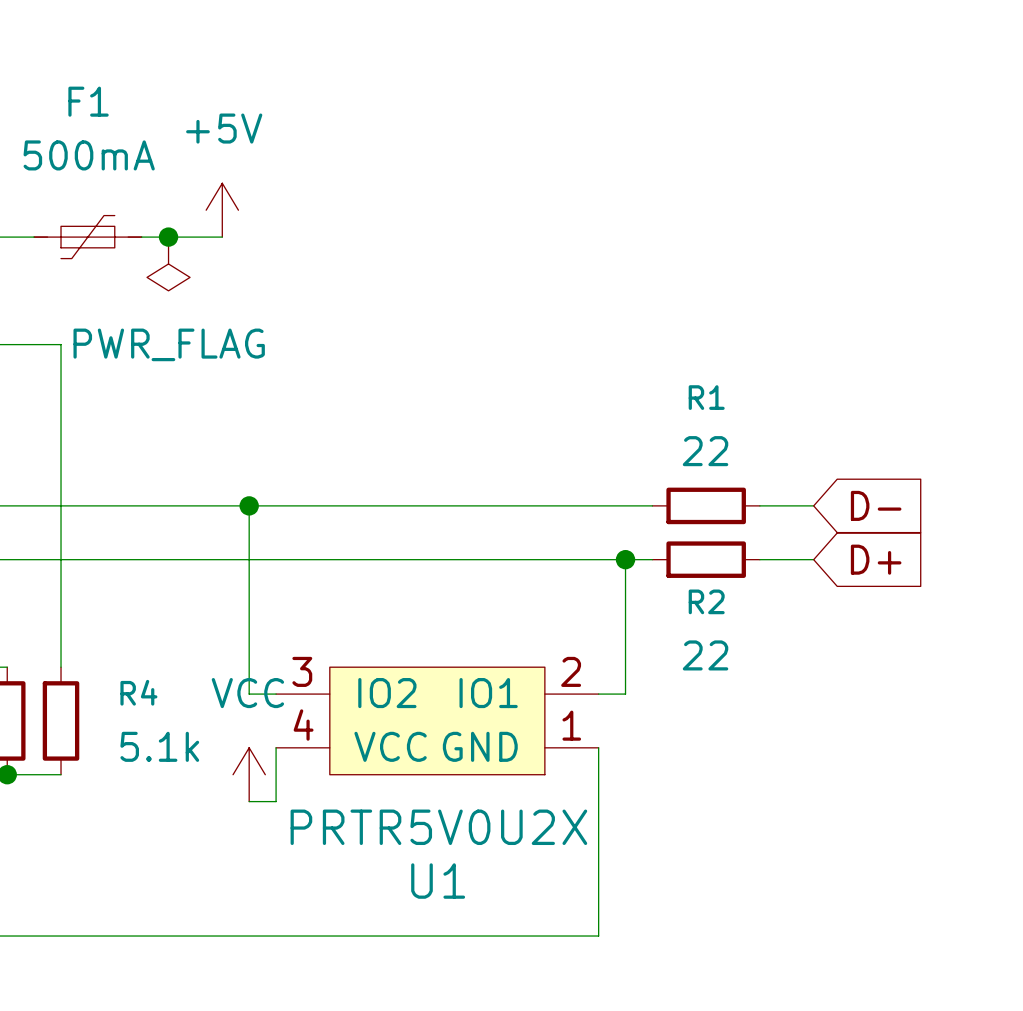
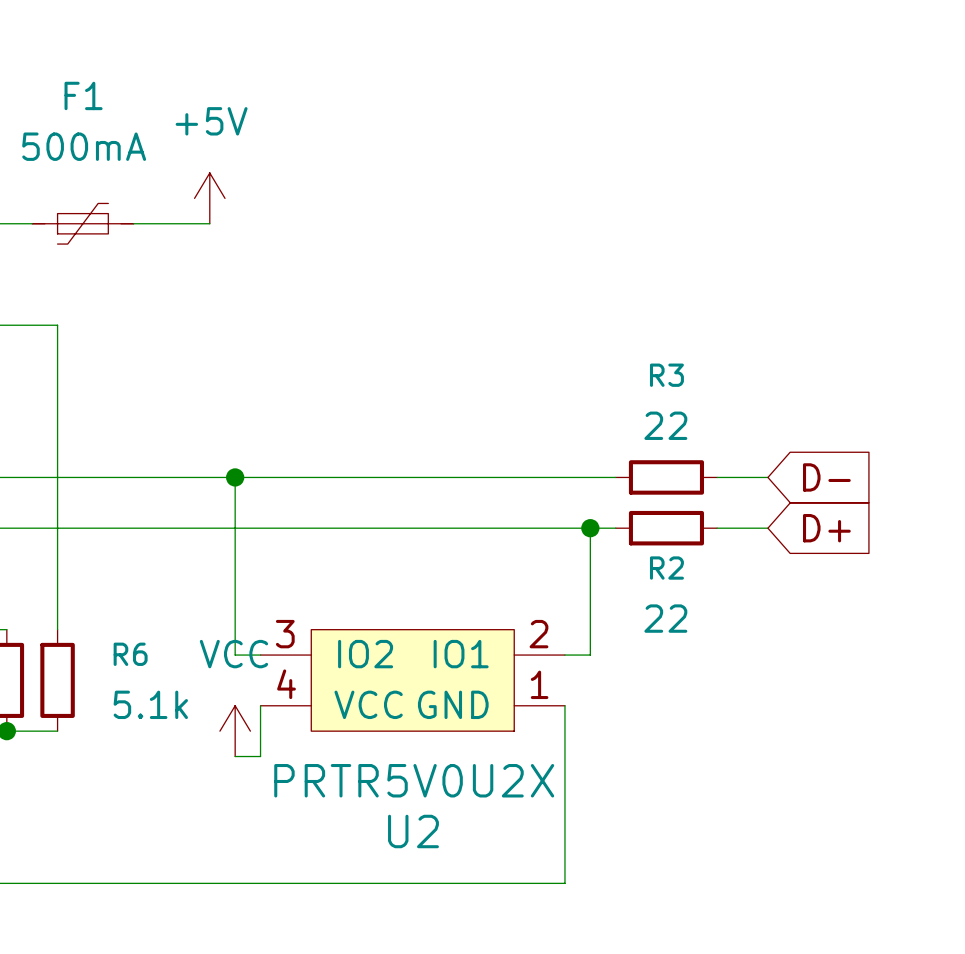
junction: (168, 237) -> none
power symbol: PWR_FLAG (168, 263) -> none
R1 name: R1 (706, 397) -> R3 (666, 375)
R4 name: R4 (138, 692) -> R6 (130, 654)
U1 name: U1 (438, 881) -> U2 (413, 831)

